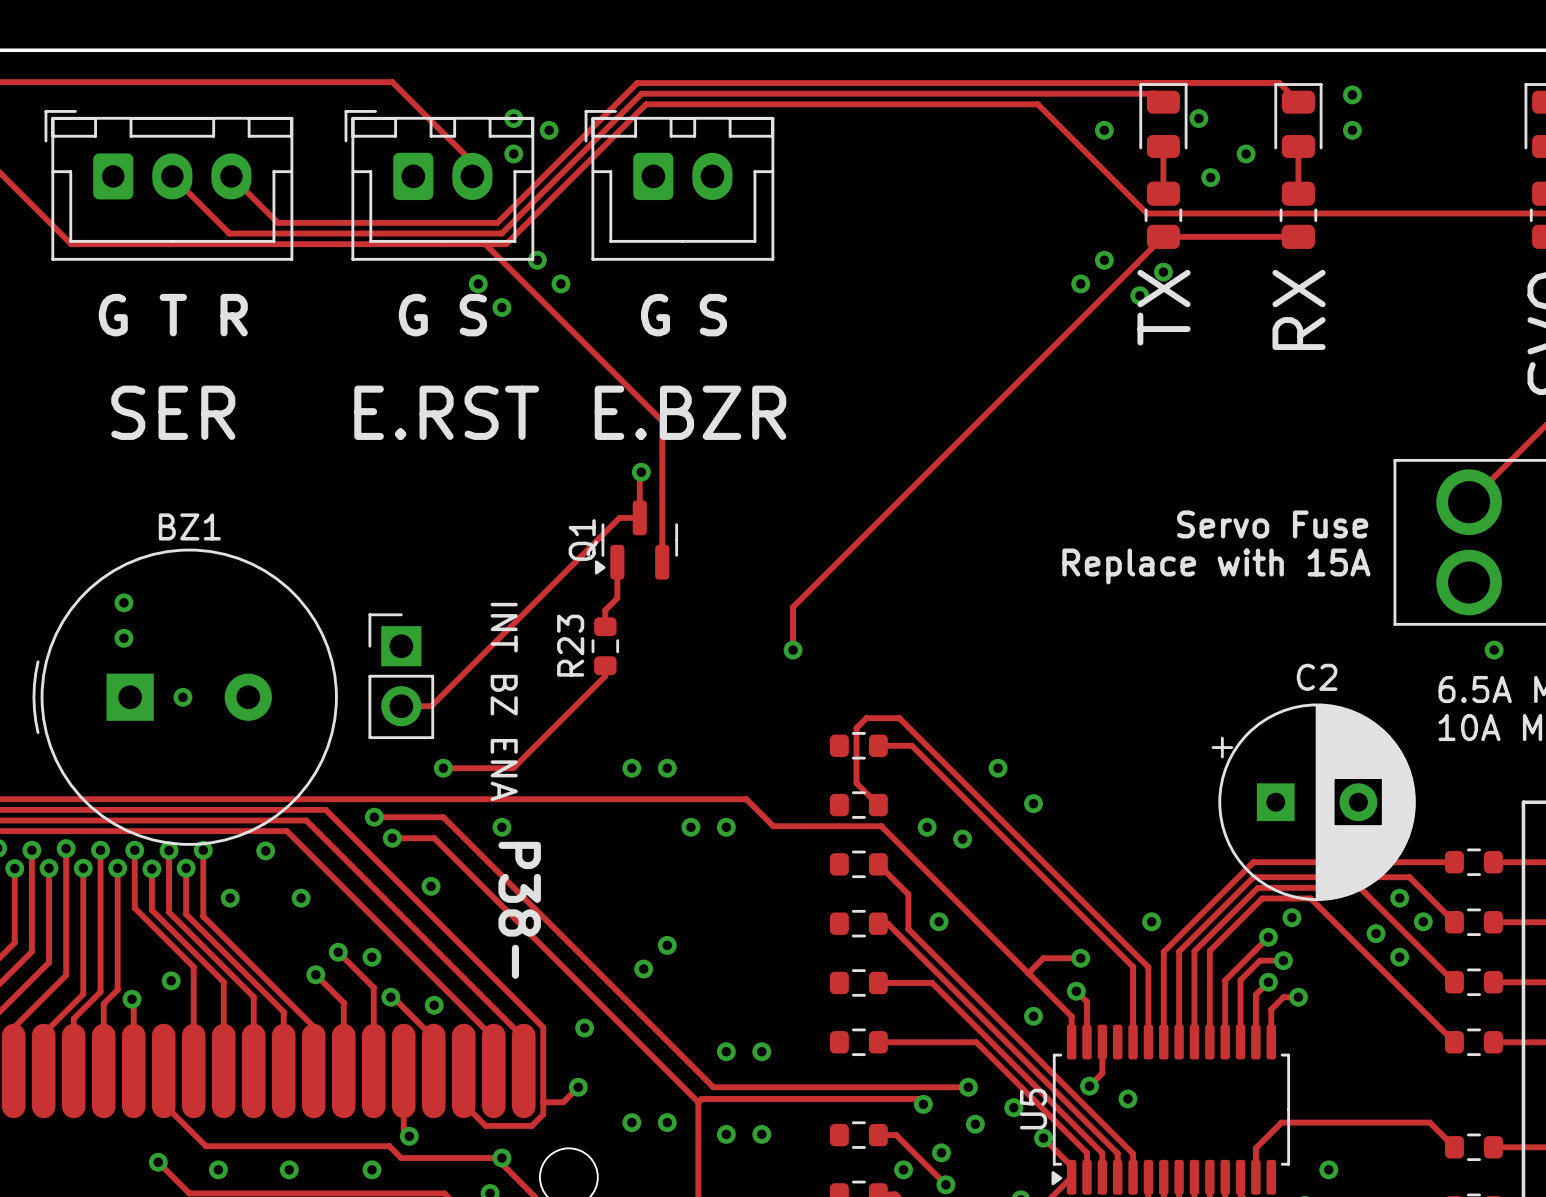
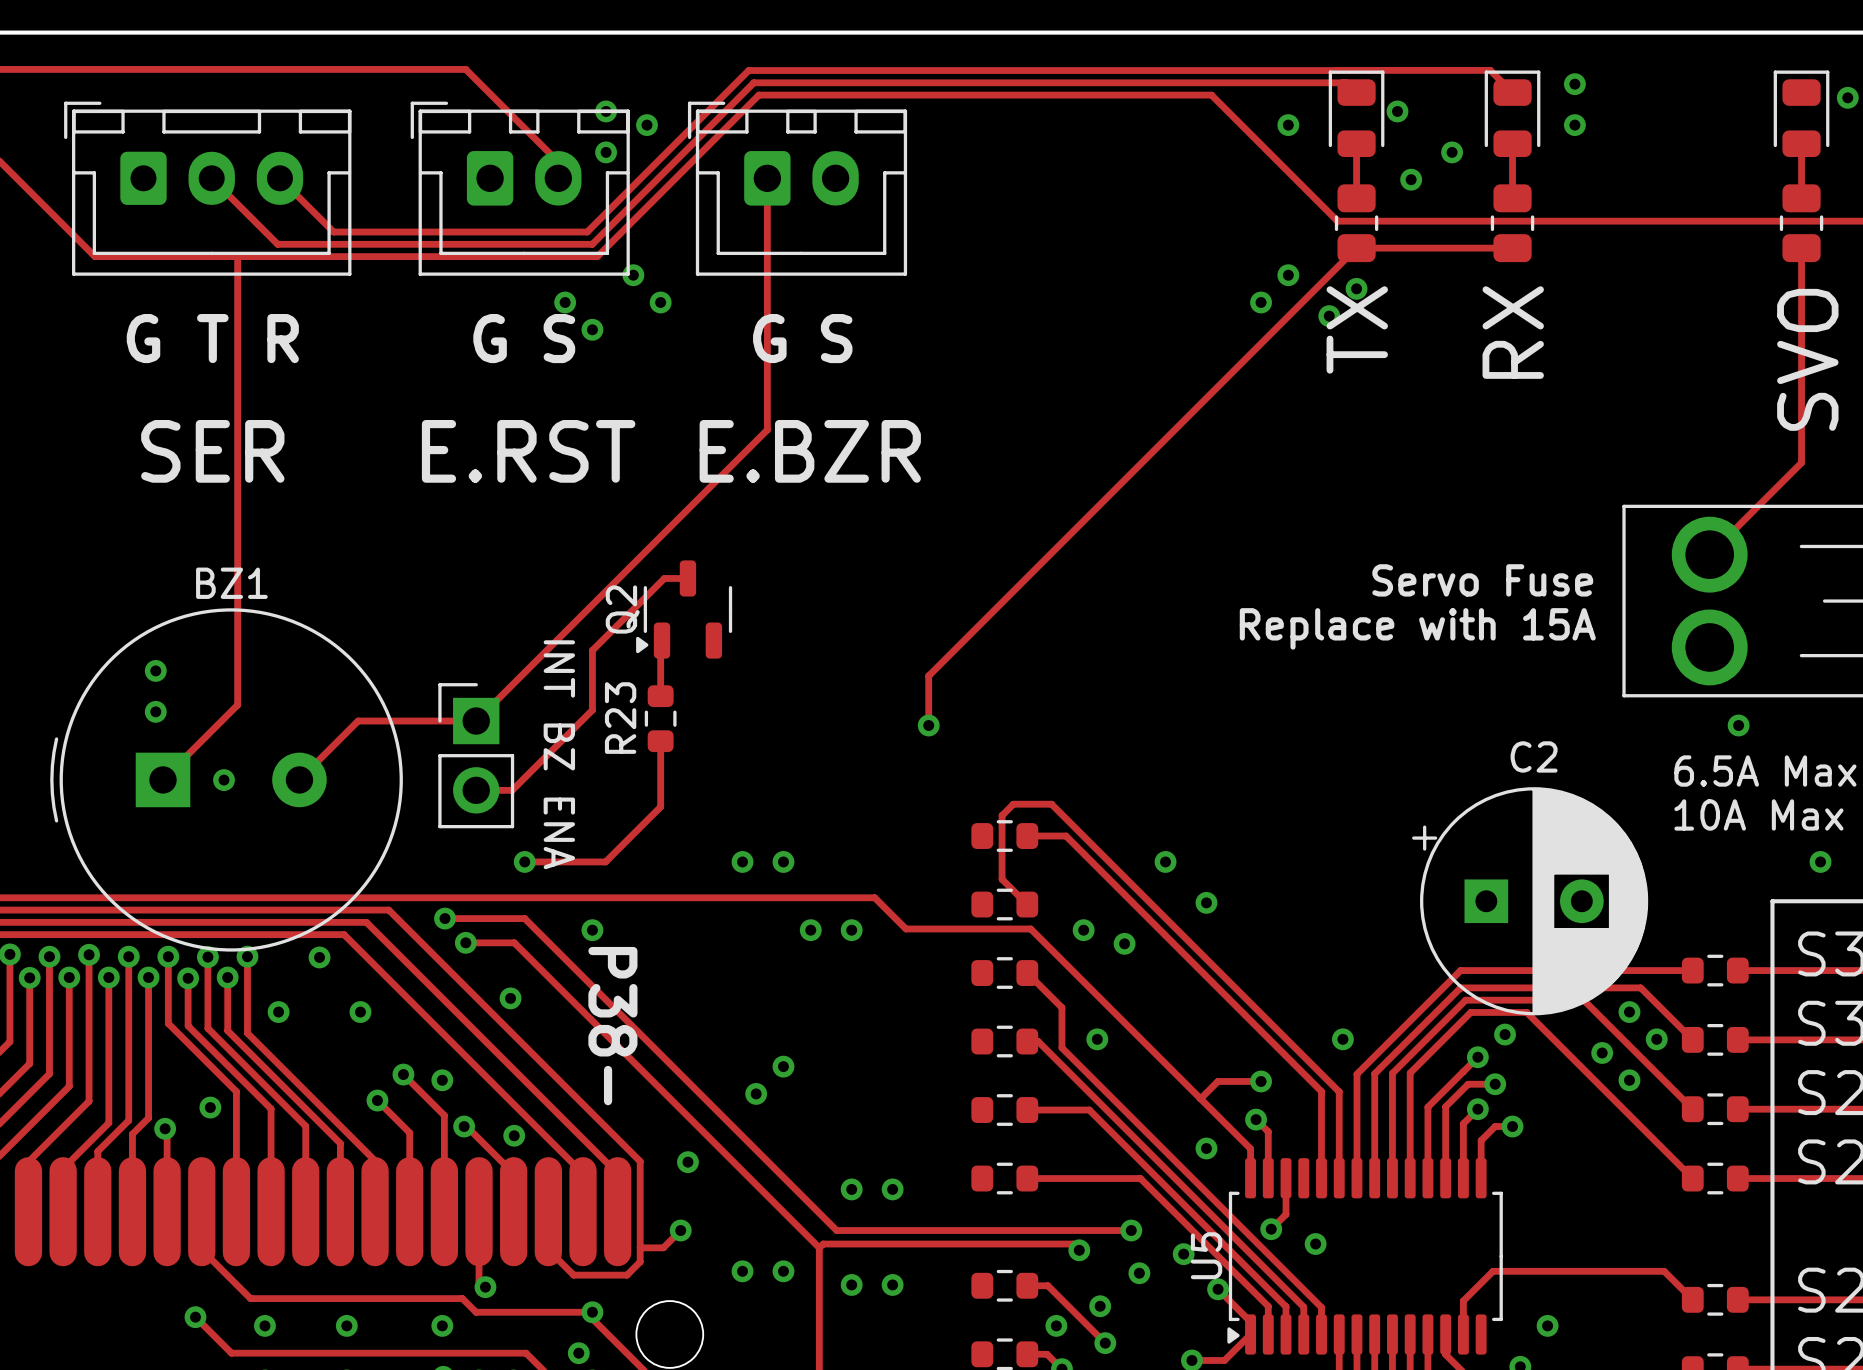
track: none -> (767, 178) (767, 429) (476, 721) (358, 721) (299, 780)
track: none -> (237, 256) (237, 705) (162, 780)
track: (485, 244) (662, 421) (662, 562) -> none
track: (641, 472) (639, 473) (639, 517) (619, 517) (431, 706) -> (687, 578) (664, 578) (592, 650) (592, 710) (510, 790)
via: (641, 472) -> none
Q1: (636, 540) -> none
Q2: none -> (684, 609)
track: (617, 562) (617, 598) (605, 610) (605, 626) -> none
track: none -> (662, 640) (660, 696)
R23 position: (605, 646) -> (660, 718)
track: (605, 665) (605, 676) (560, 720) -> (660, 741) (660, 806)
text position: INT BZ ENA (504, 701) -> INT BZ ENA (559, 754)

